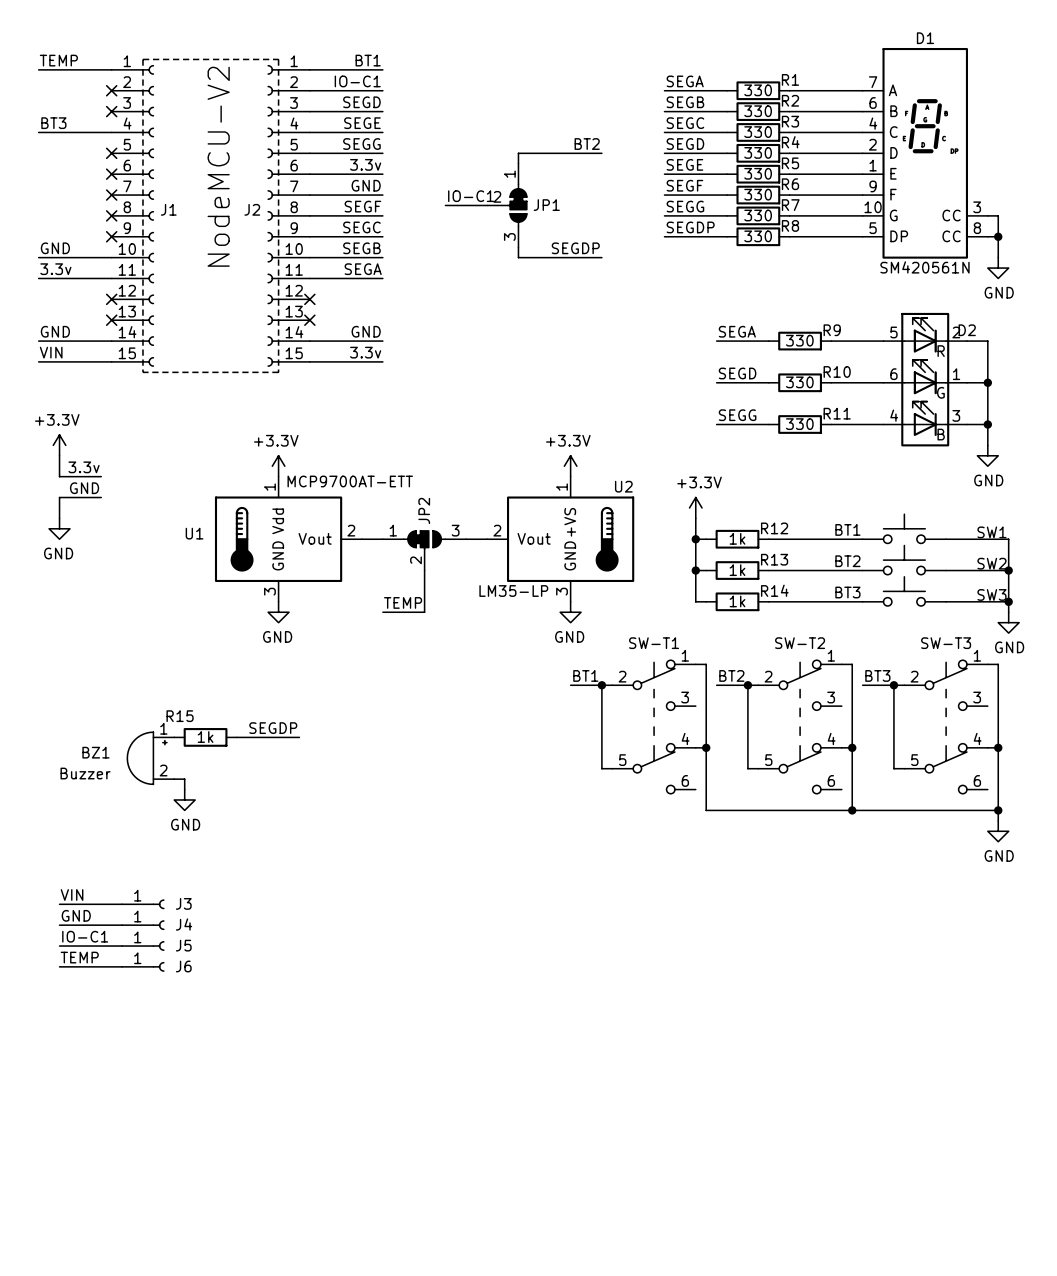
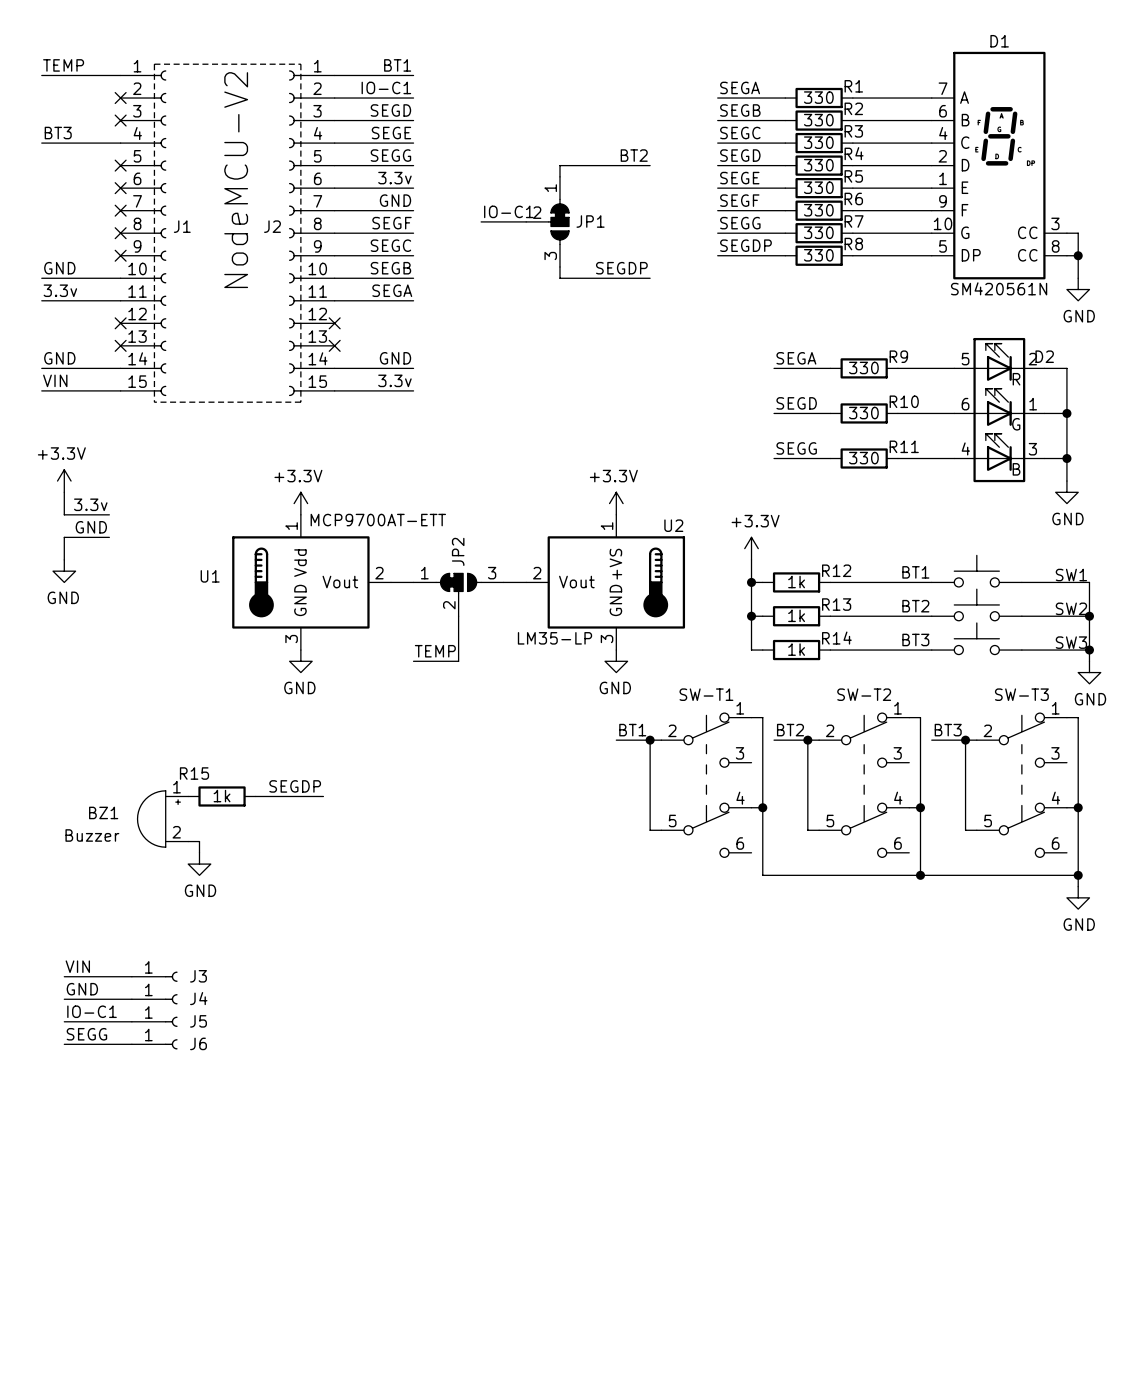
label: TEMP (79, 957) -> SEGG (86, 1034)

